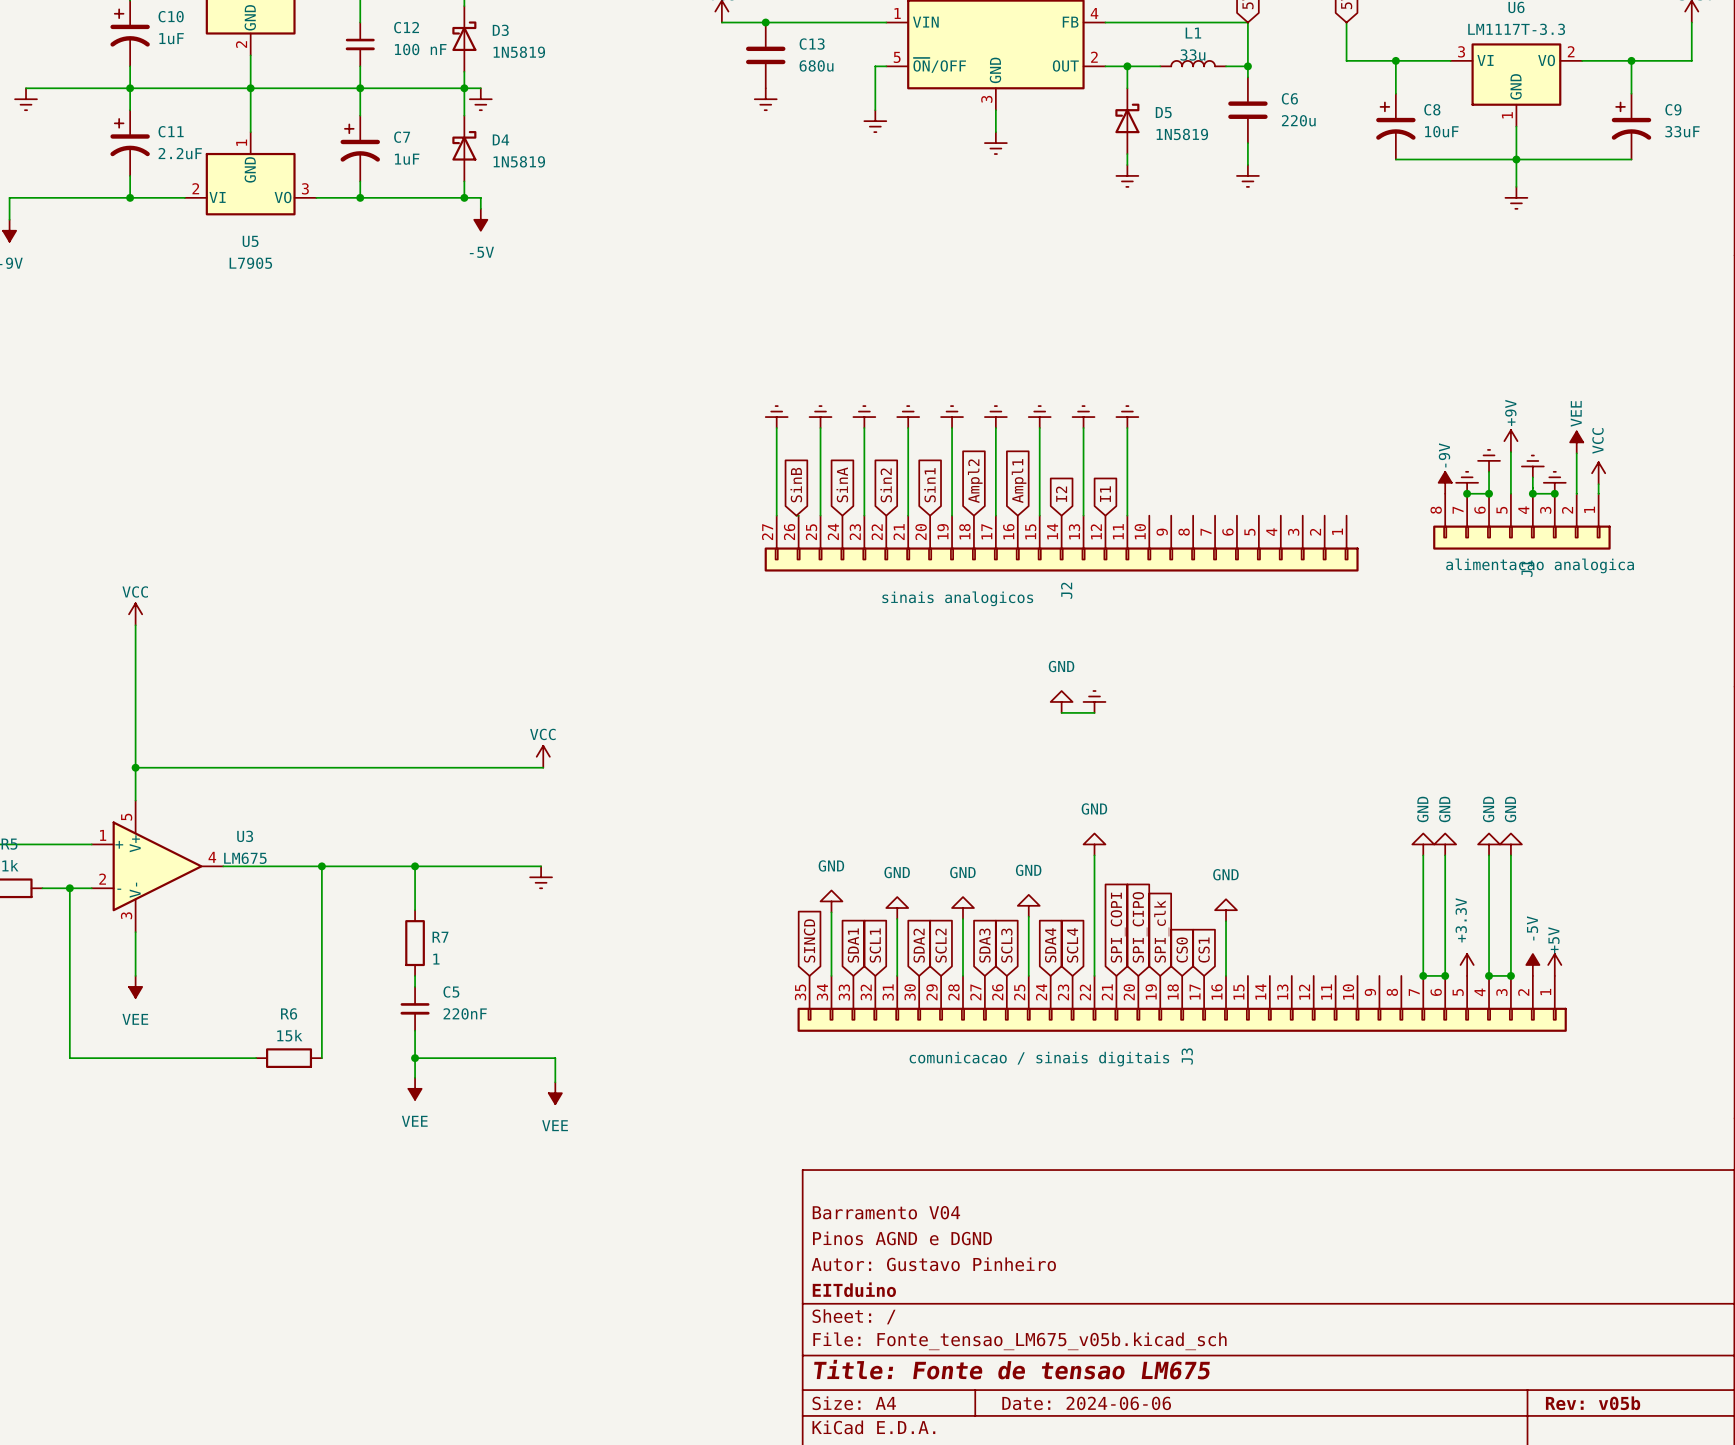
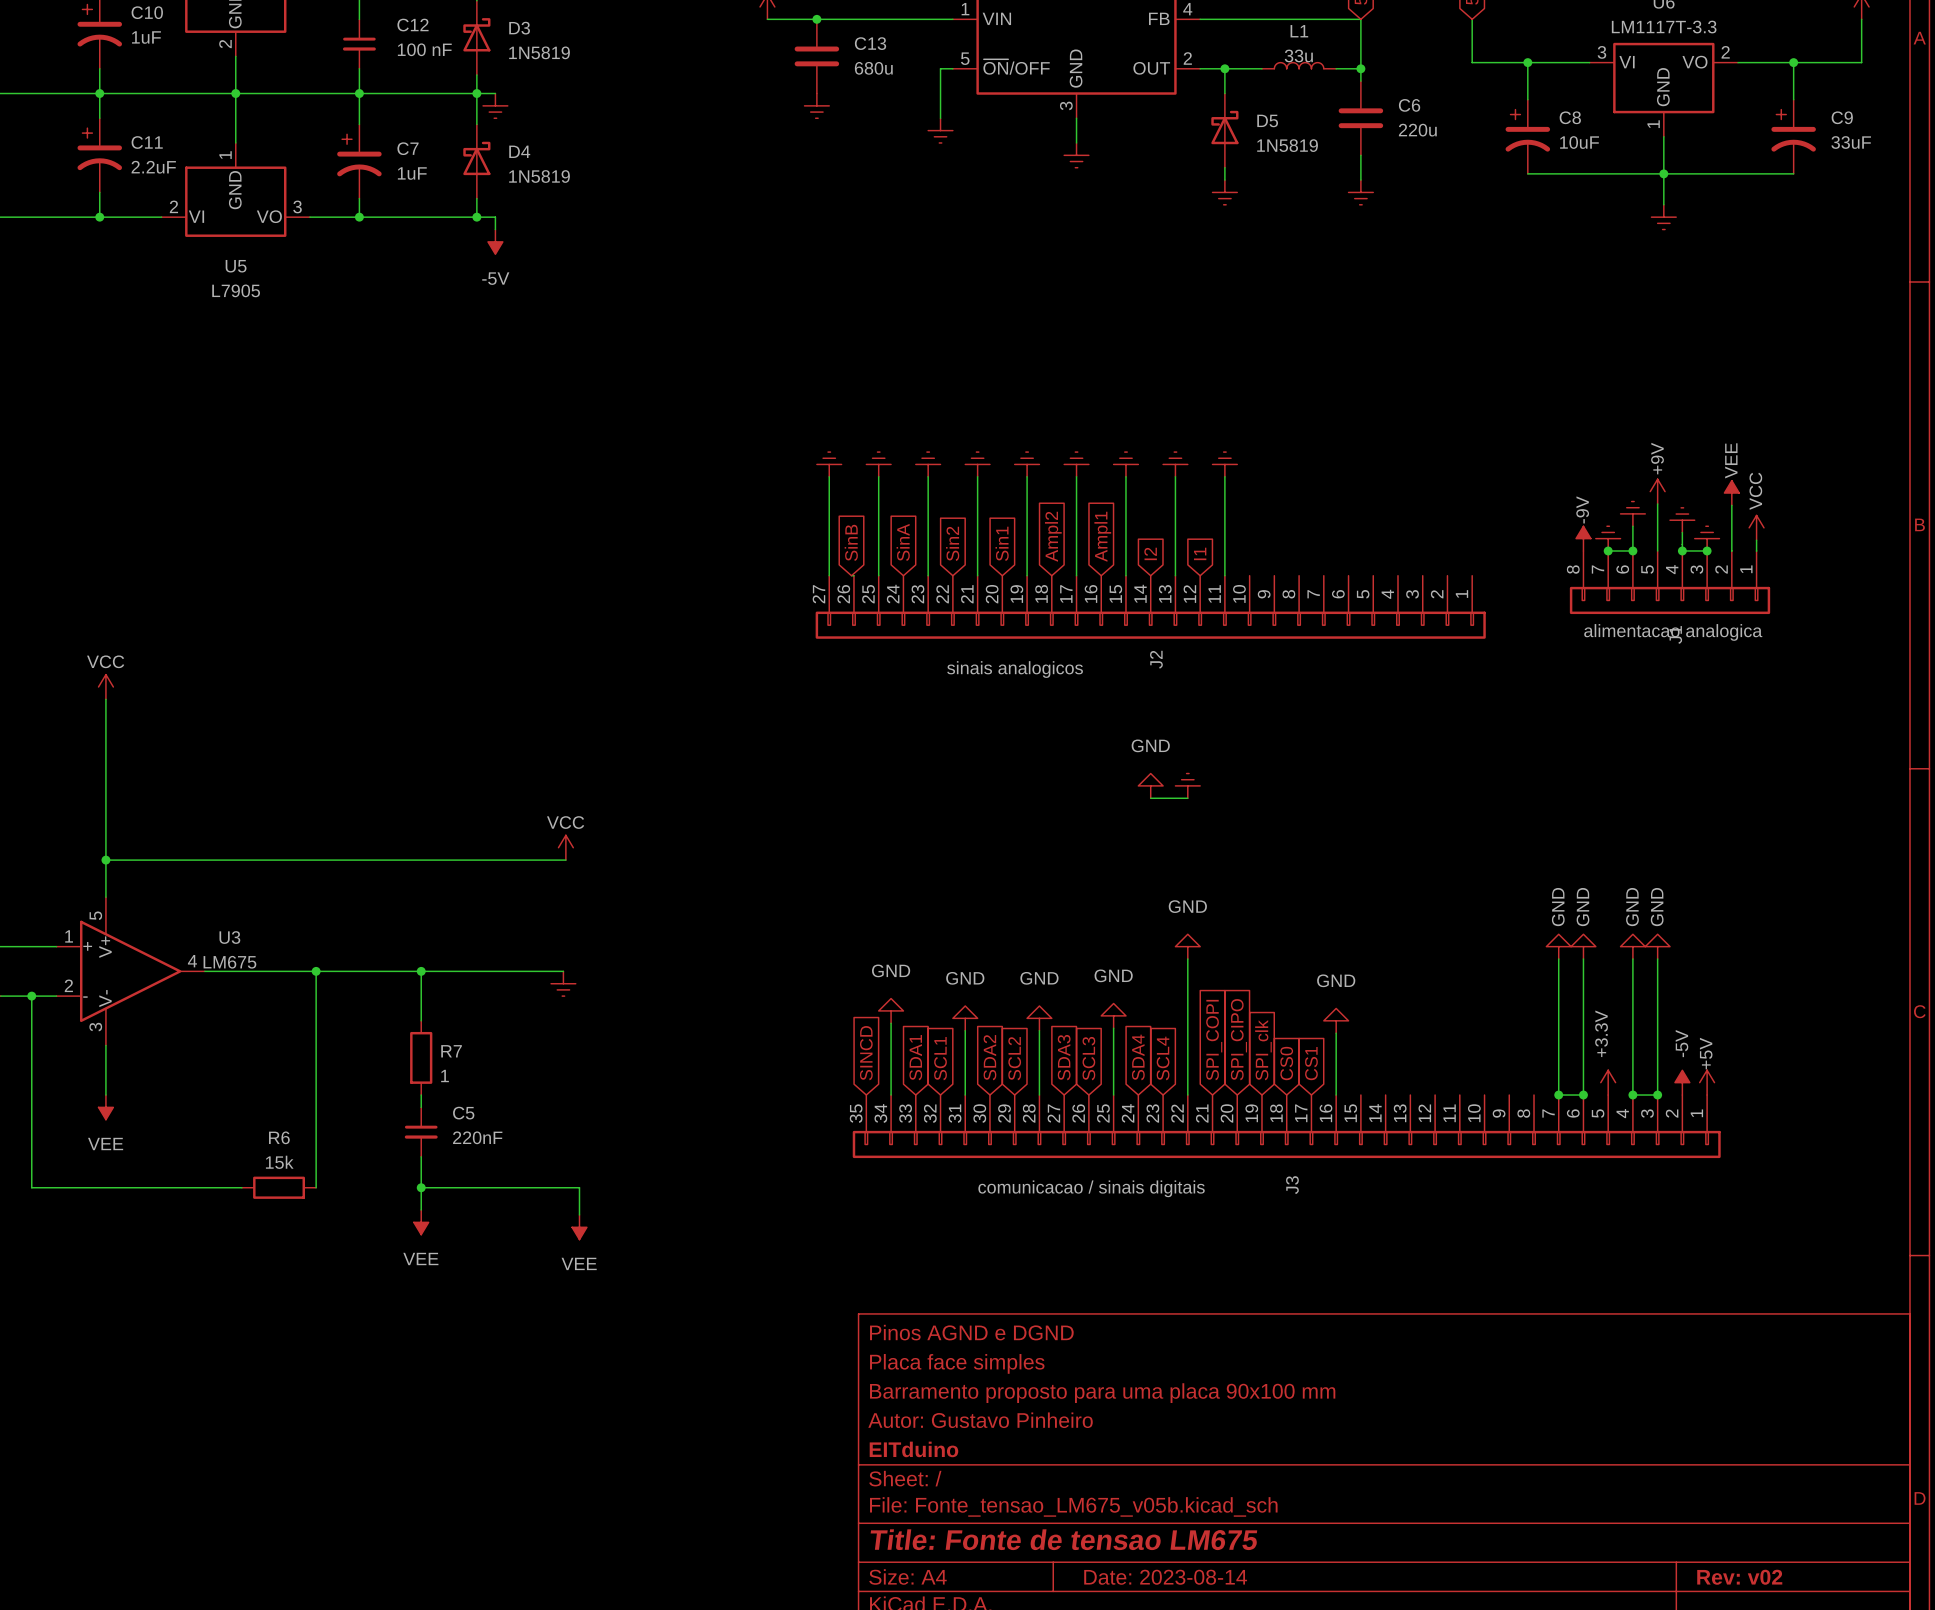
title block: none -> Pinos AGND e DGND (971, 1332)
title block: Barramento V04 (886, 1212) -> Placa face simples (957, 1363)
title block: Pinos AGND e DGND (902, 1238) -> Barramento proposto para uma placa 90x100 mm (1102, 1393)
title block: Date: 2024-06-06 (1086, 1403) -> Date: 2023-08-14 (1165, 1577)
title block: Rev: v05b (1593, 1403) -> Rev: v02 (1739, 1577)

